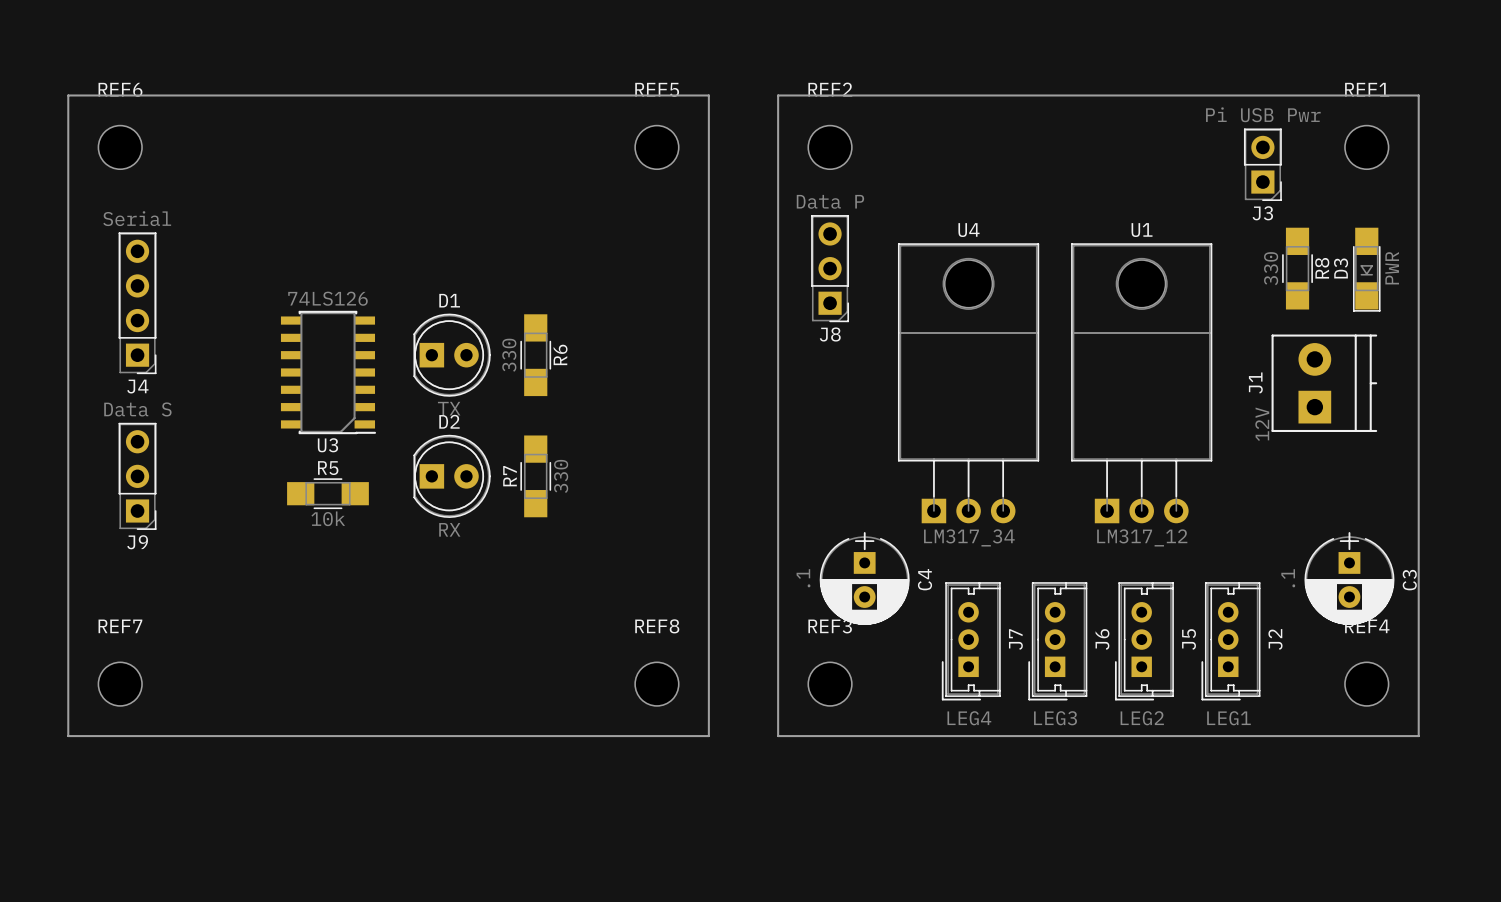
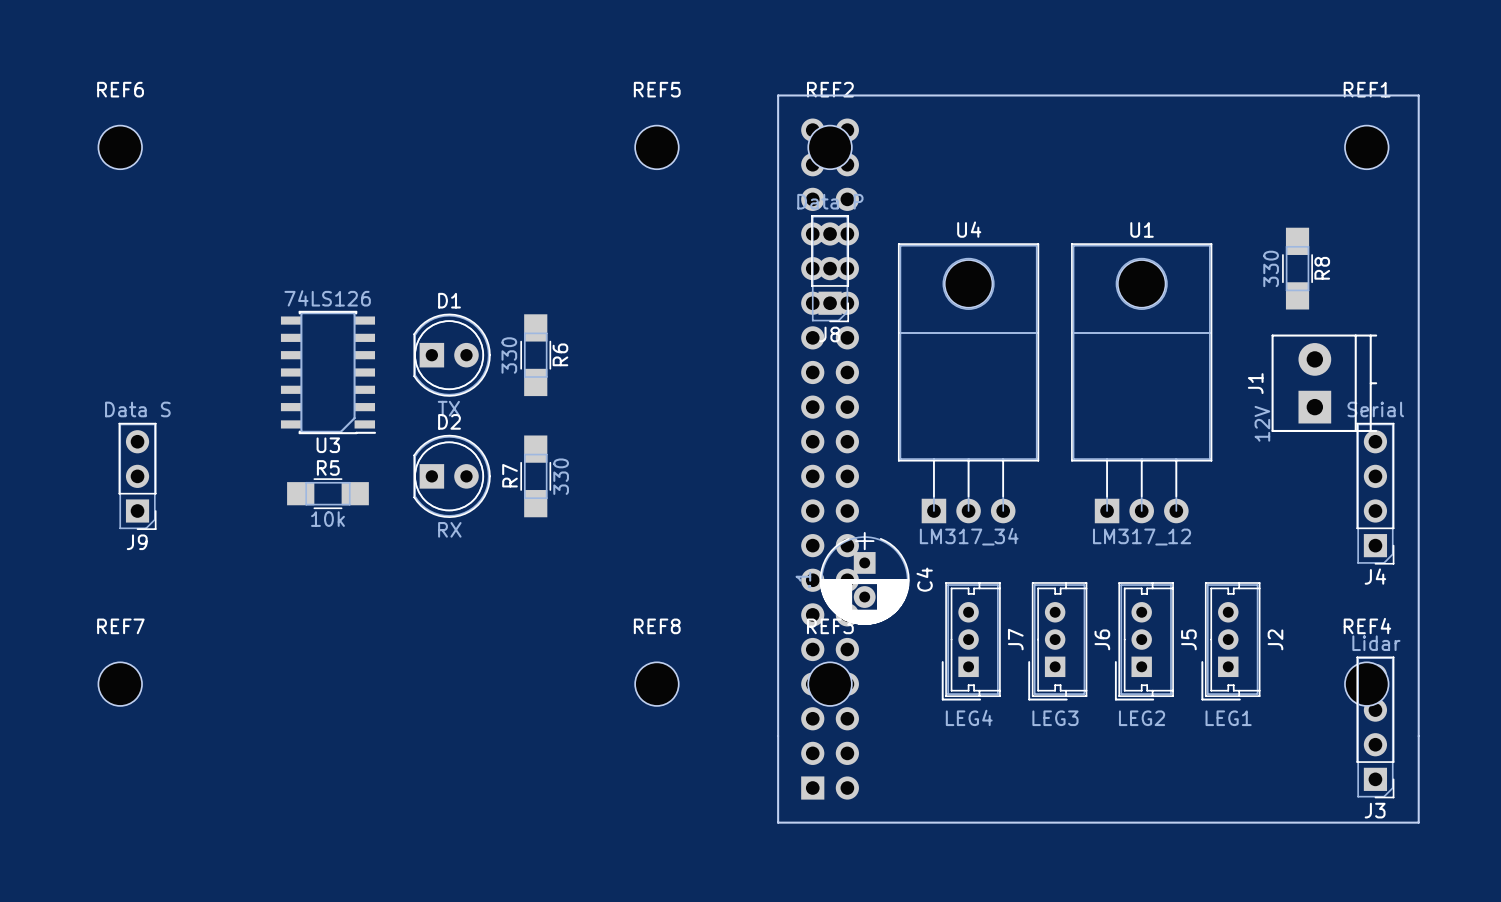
board edge: (68, 95) (68, 736) (708, 736) (708, 95) (68, 95) -> none
J3 value: Pi USB Pwr (1263, 114) -> Lidar (1376, 643)
J3 footprint: [1243, 128, 1282, 201] -> [1356, 656, 1395, 799]
J3 name position: J3 (1262, 213) -> J3 (1375, 810)
D3: PWR (1366, 269) -> none
J4 position: (137, 303) -> (1375, 493)
part: none -> (830, 459)
C3: .1 (1349, 578) -> none
board edge: (778, 736) (1418, 736) -> (778, 736) (778, 822) (1418, 822) (1418, 736)

